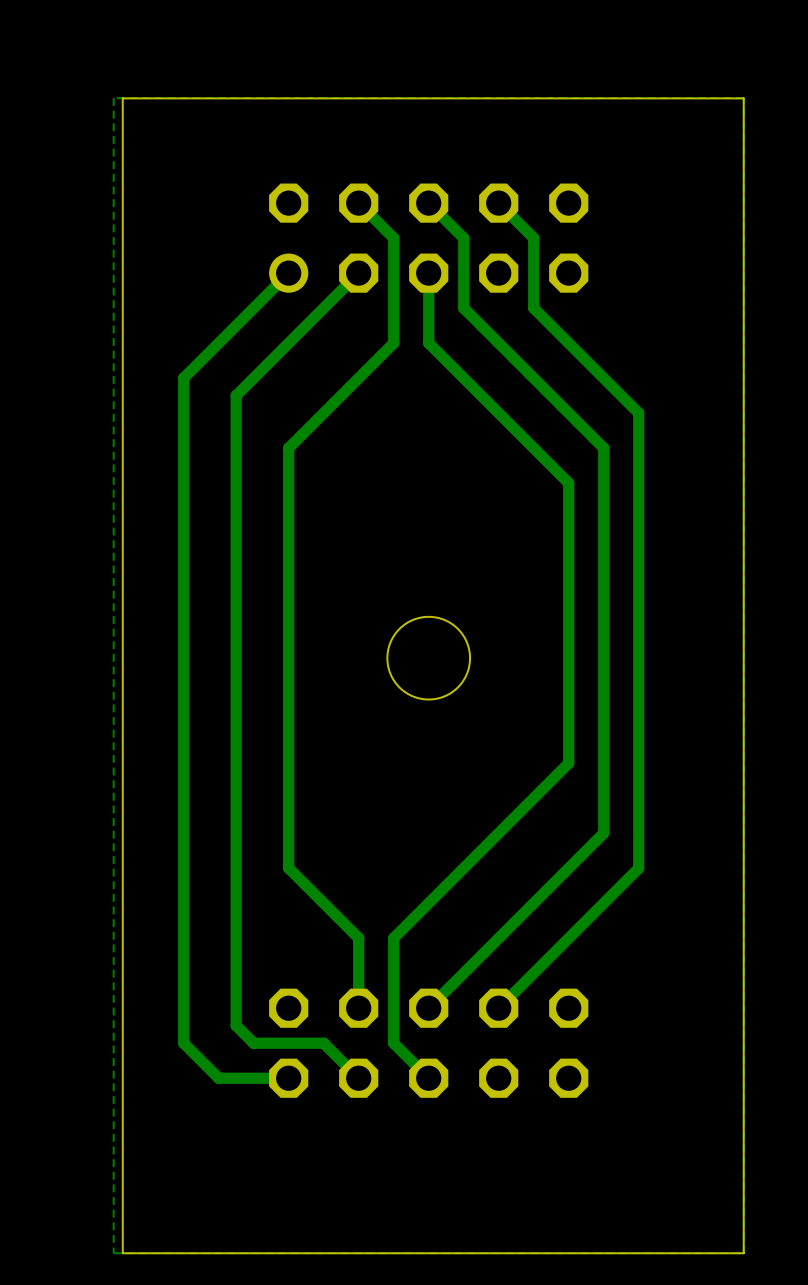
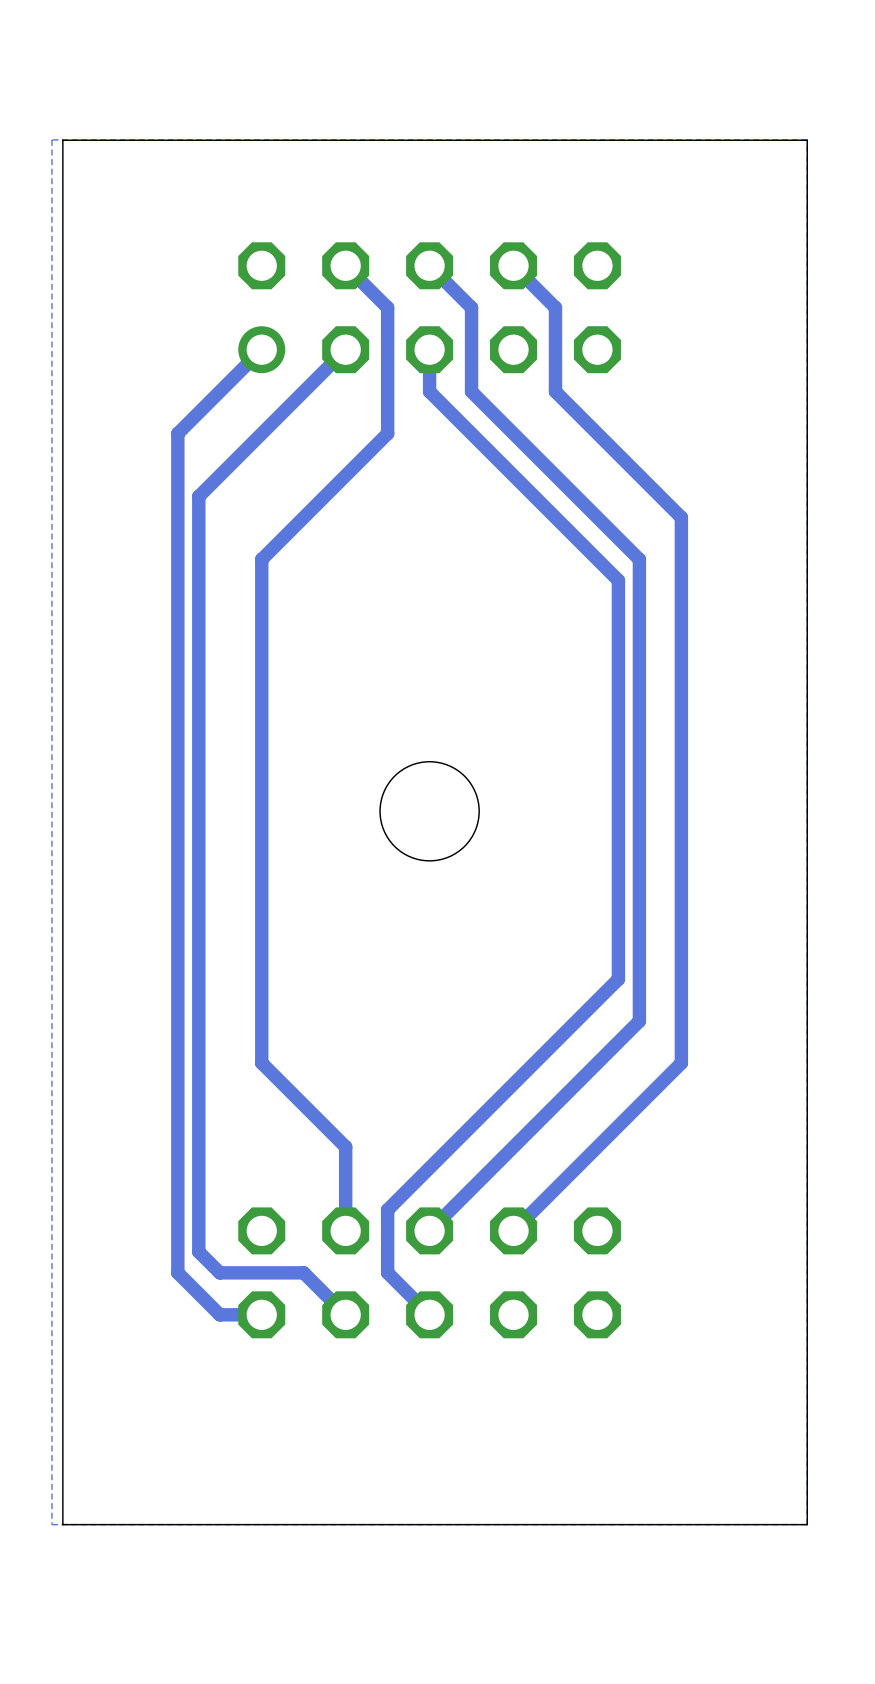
track: (428, 308) (428, 343) (568, 483) (568, 763) (393, 938) (393, 990) -> (429, 391) (618, 580) (618, 979) (387, 1209)
track: (218, 343) (183, 378) (183, 1043) (218, 1078) (253, 1078) -> (177, 433) (177, 1272) (219, 1314)

